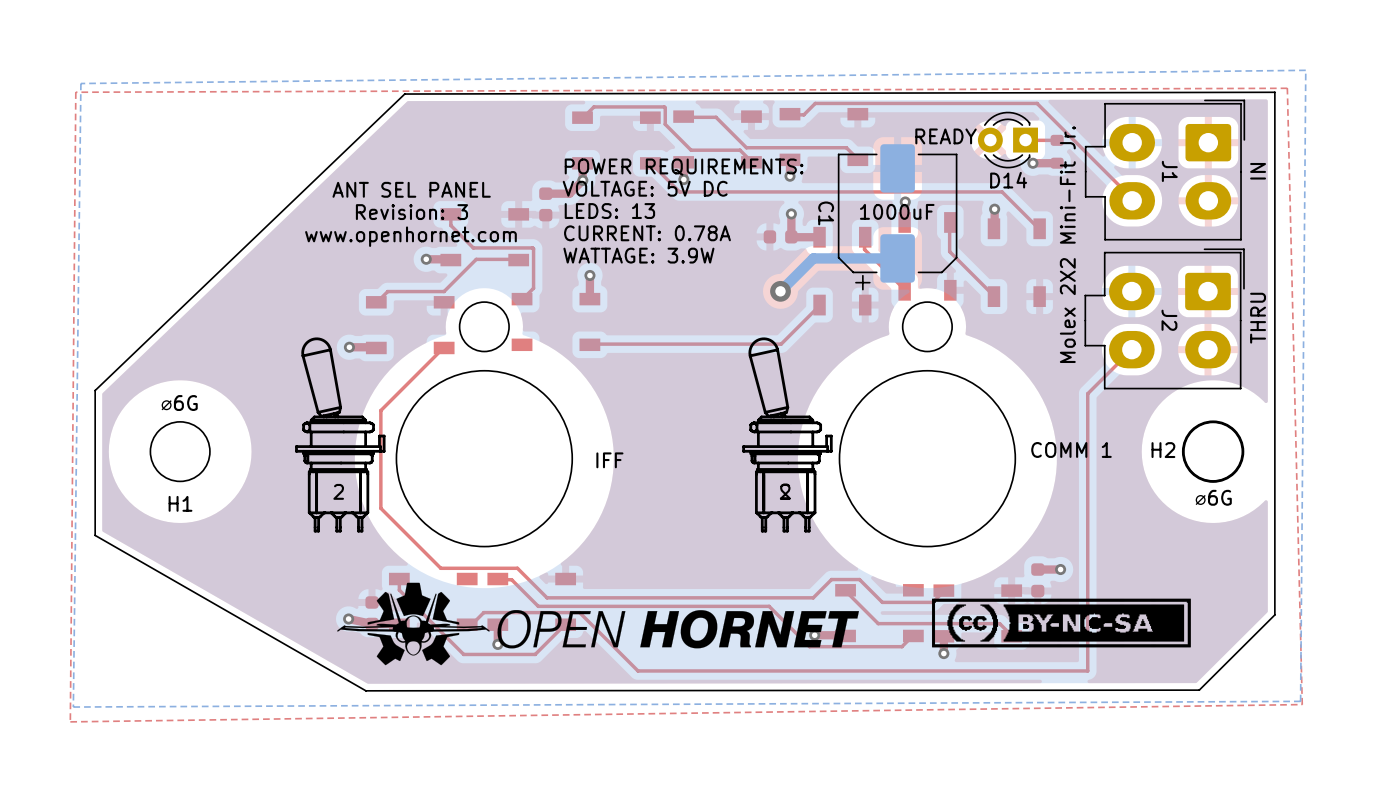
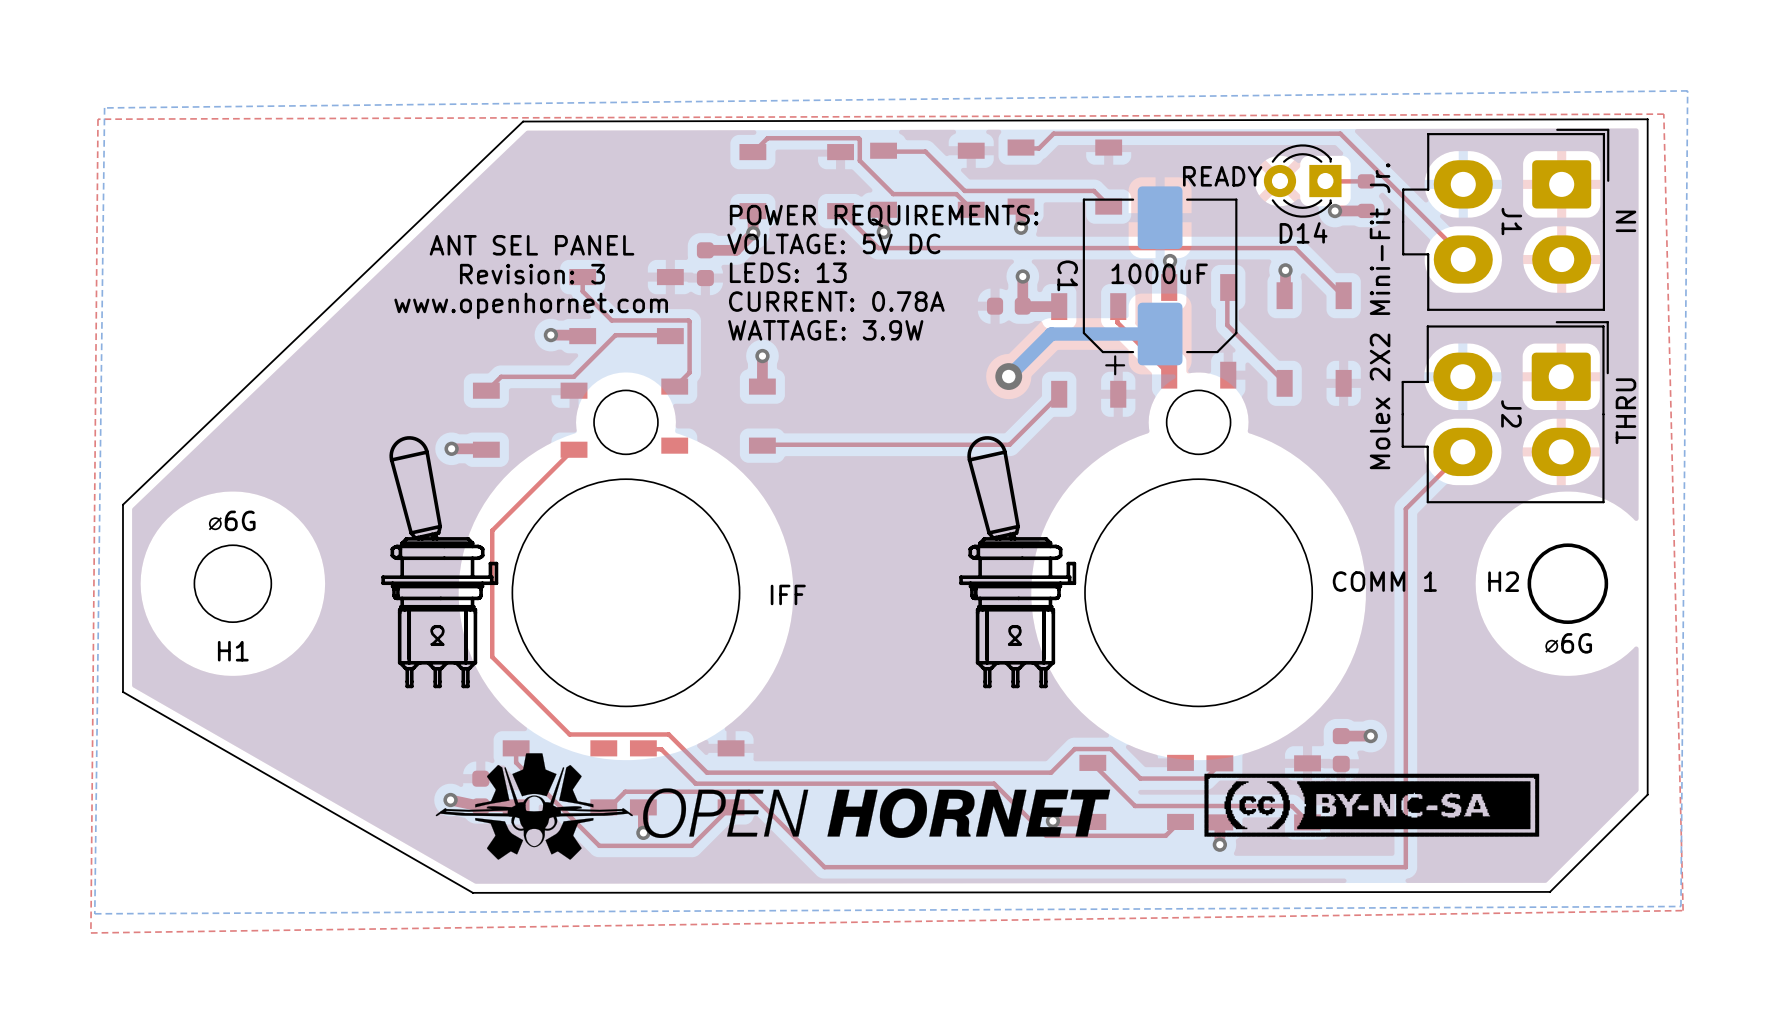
drawing shape: [295, 337, 386, 533] -> [381, 436, 499, 689]

